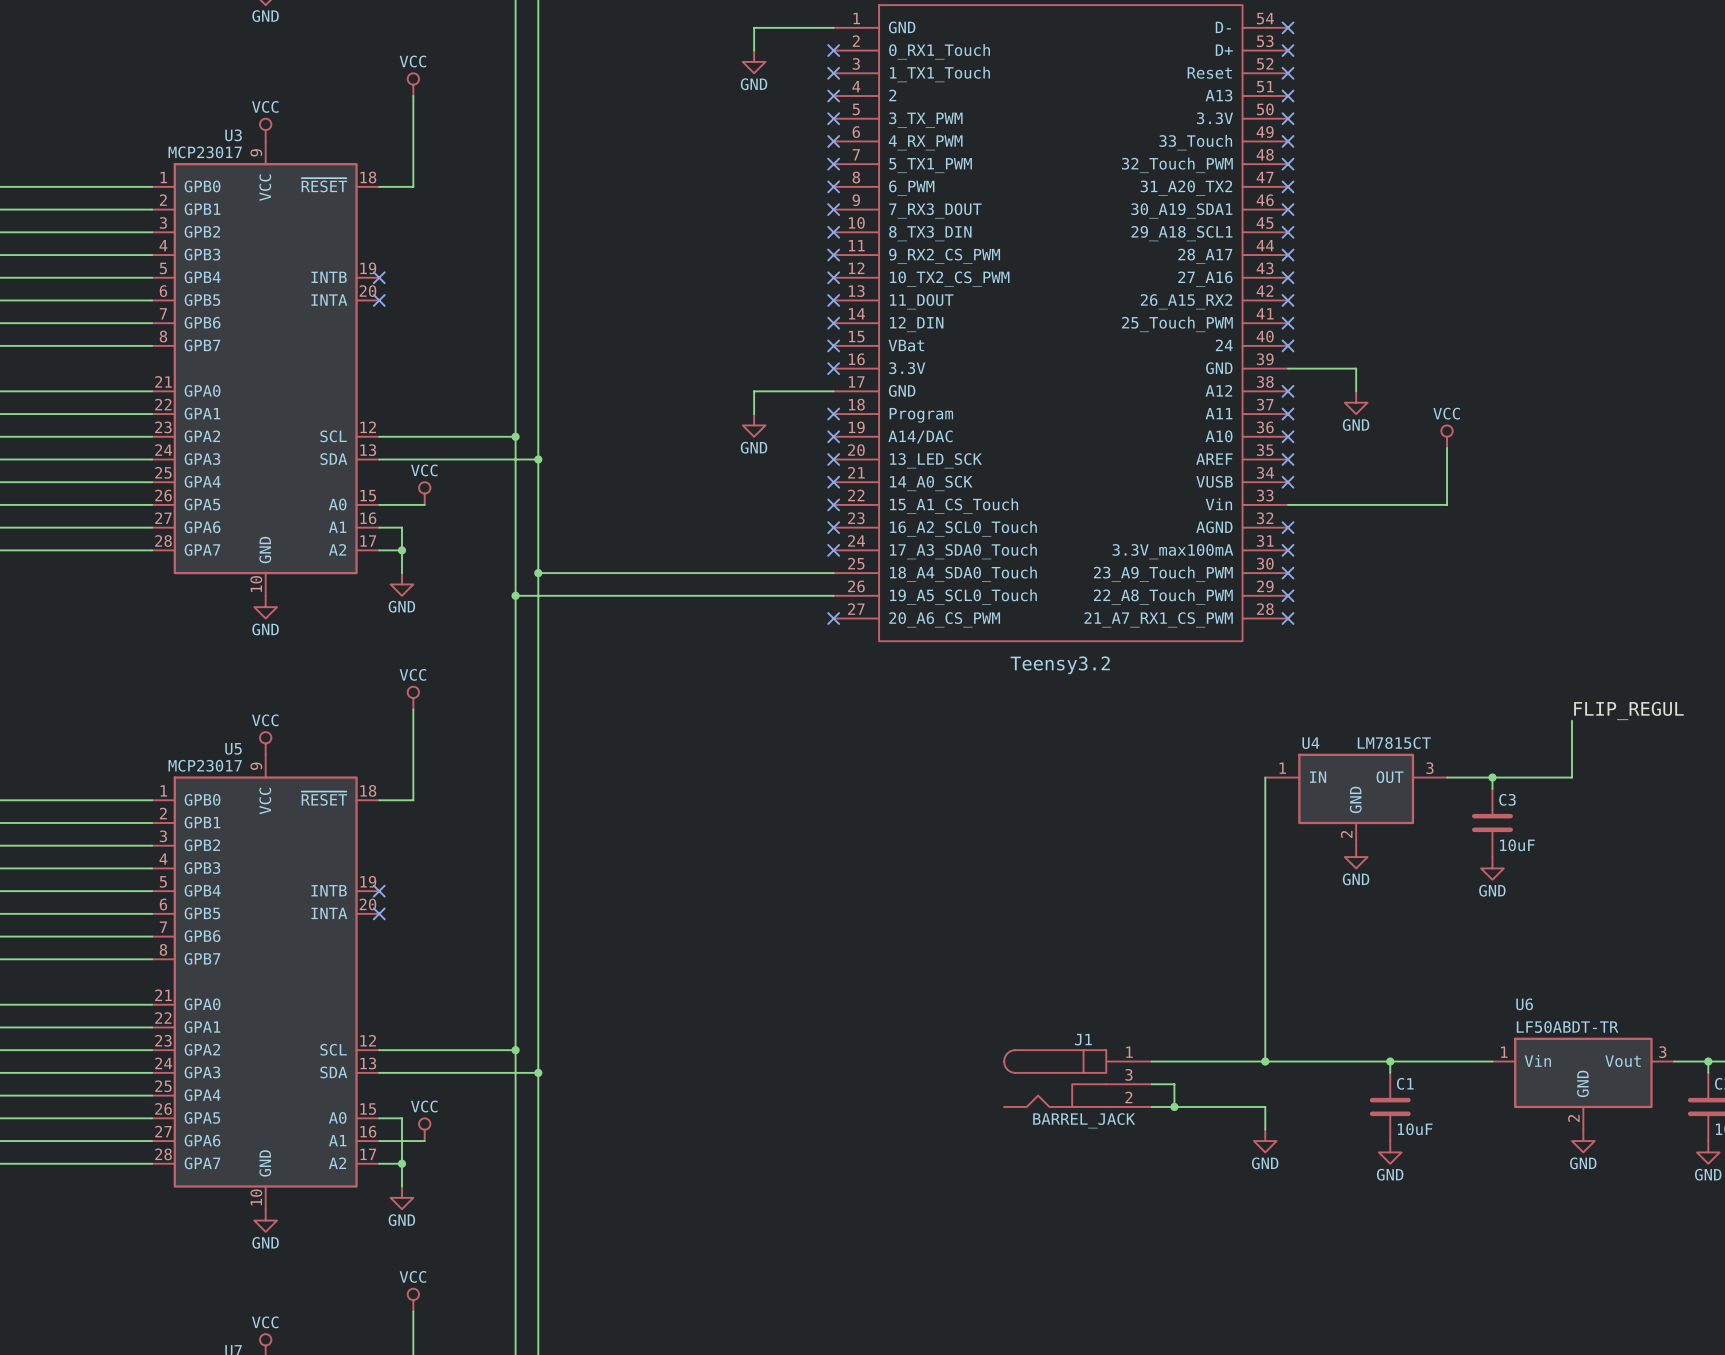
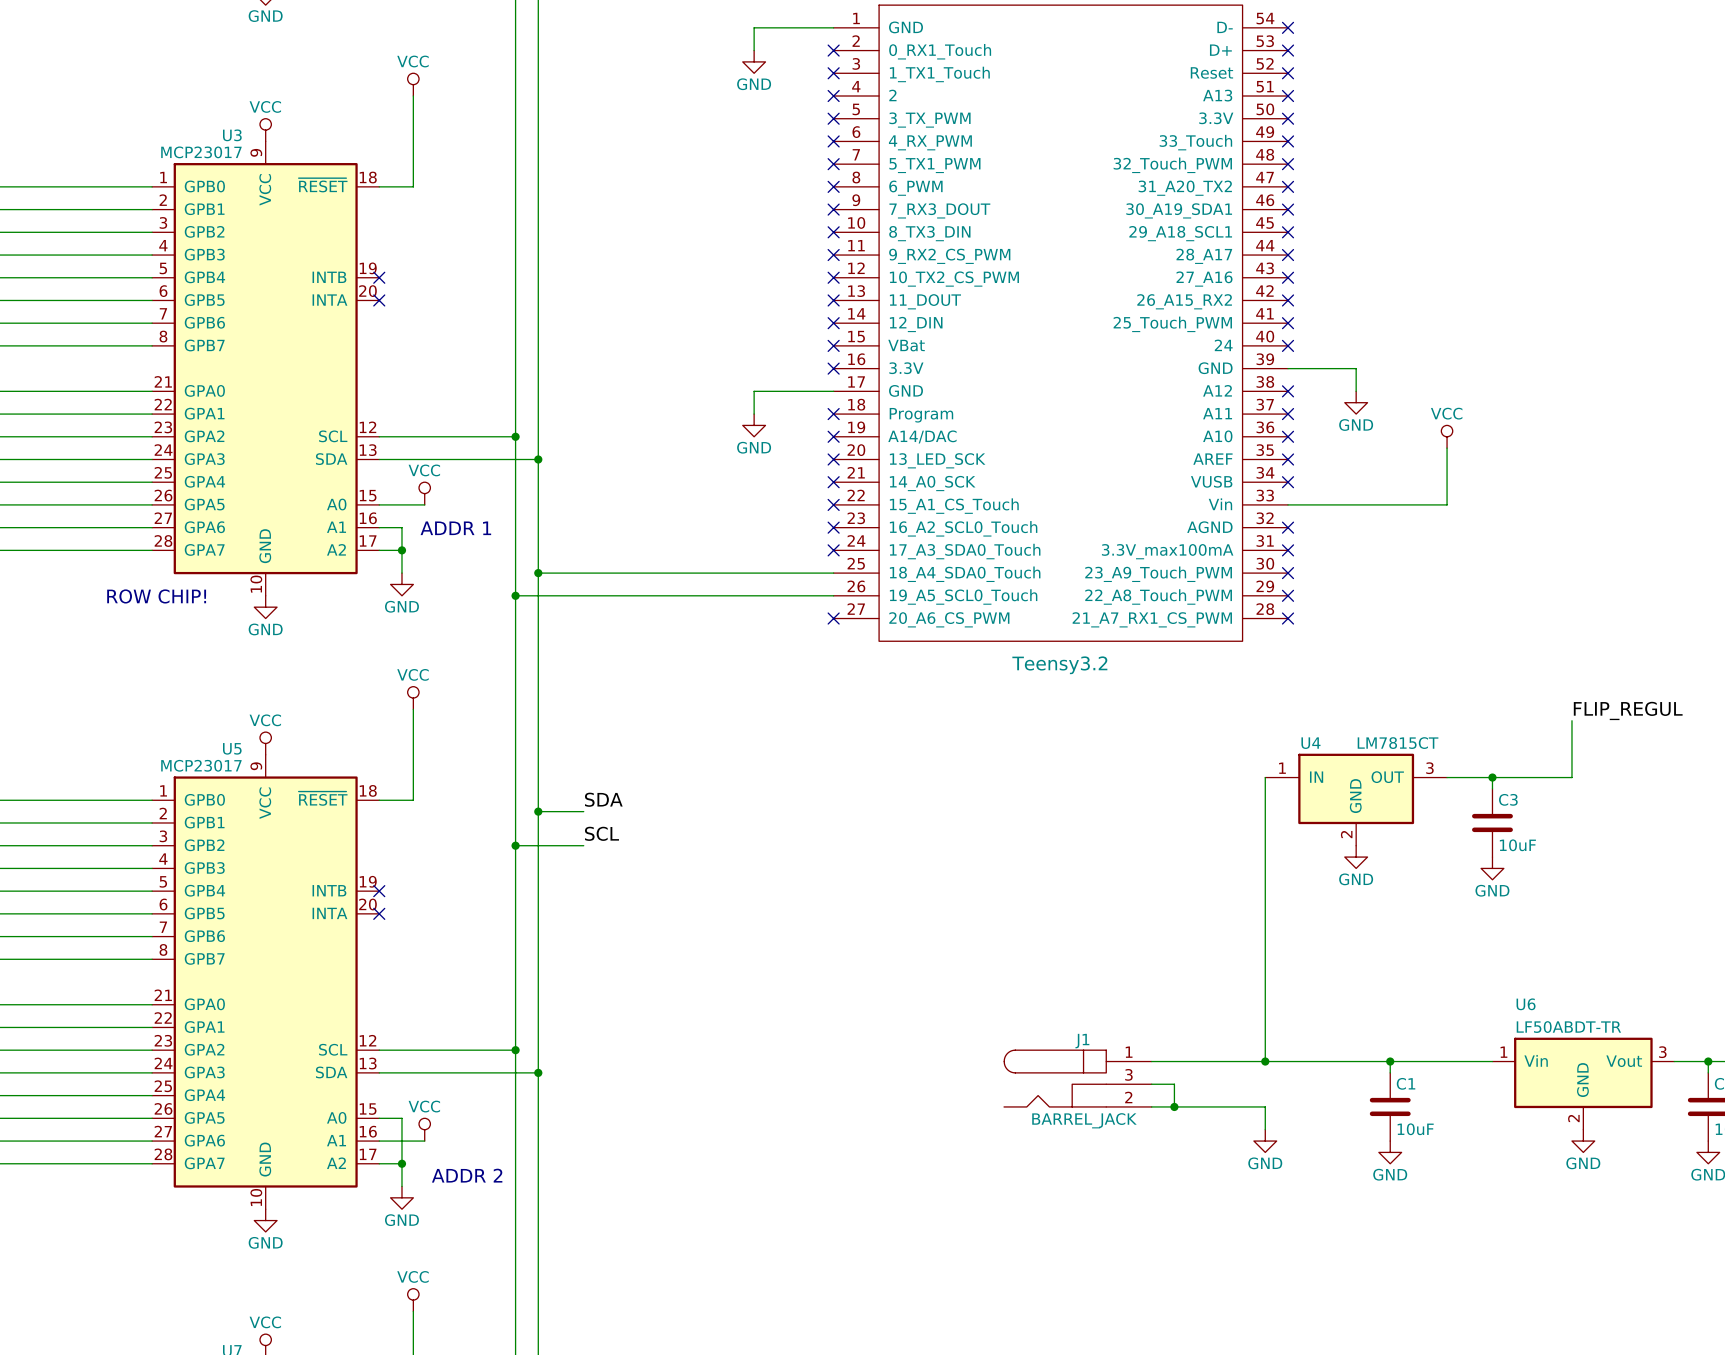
text: none -> ADDR 1 (455, 528)
text: none -> ROW CHIP! (156, 596)
label: none -> SDA (603, 799)
wire: none -> (538, 811) (583, 811)
junction: none -> (538, 811)
label: none -> SCL (601, 833)
wire: none -> (515, 845) (583, 845)
junction: none -> (515, 845)
text: none -> ADDR 2 (467, 1175)

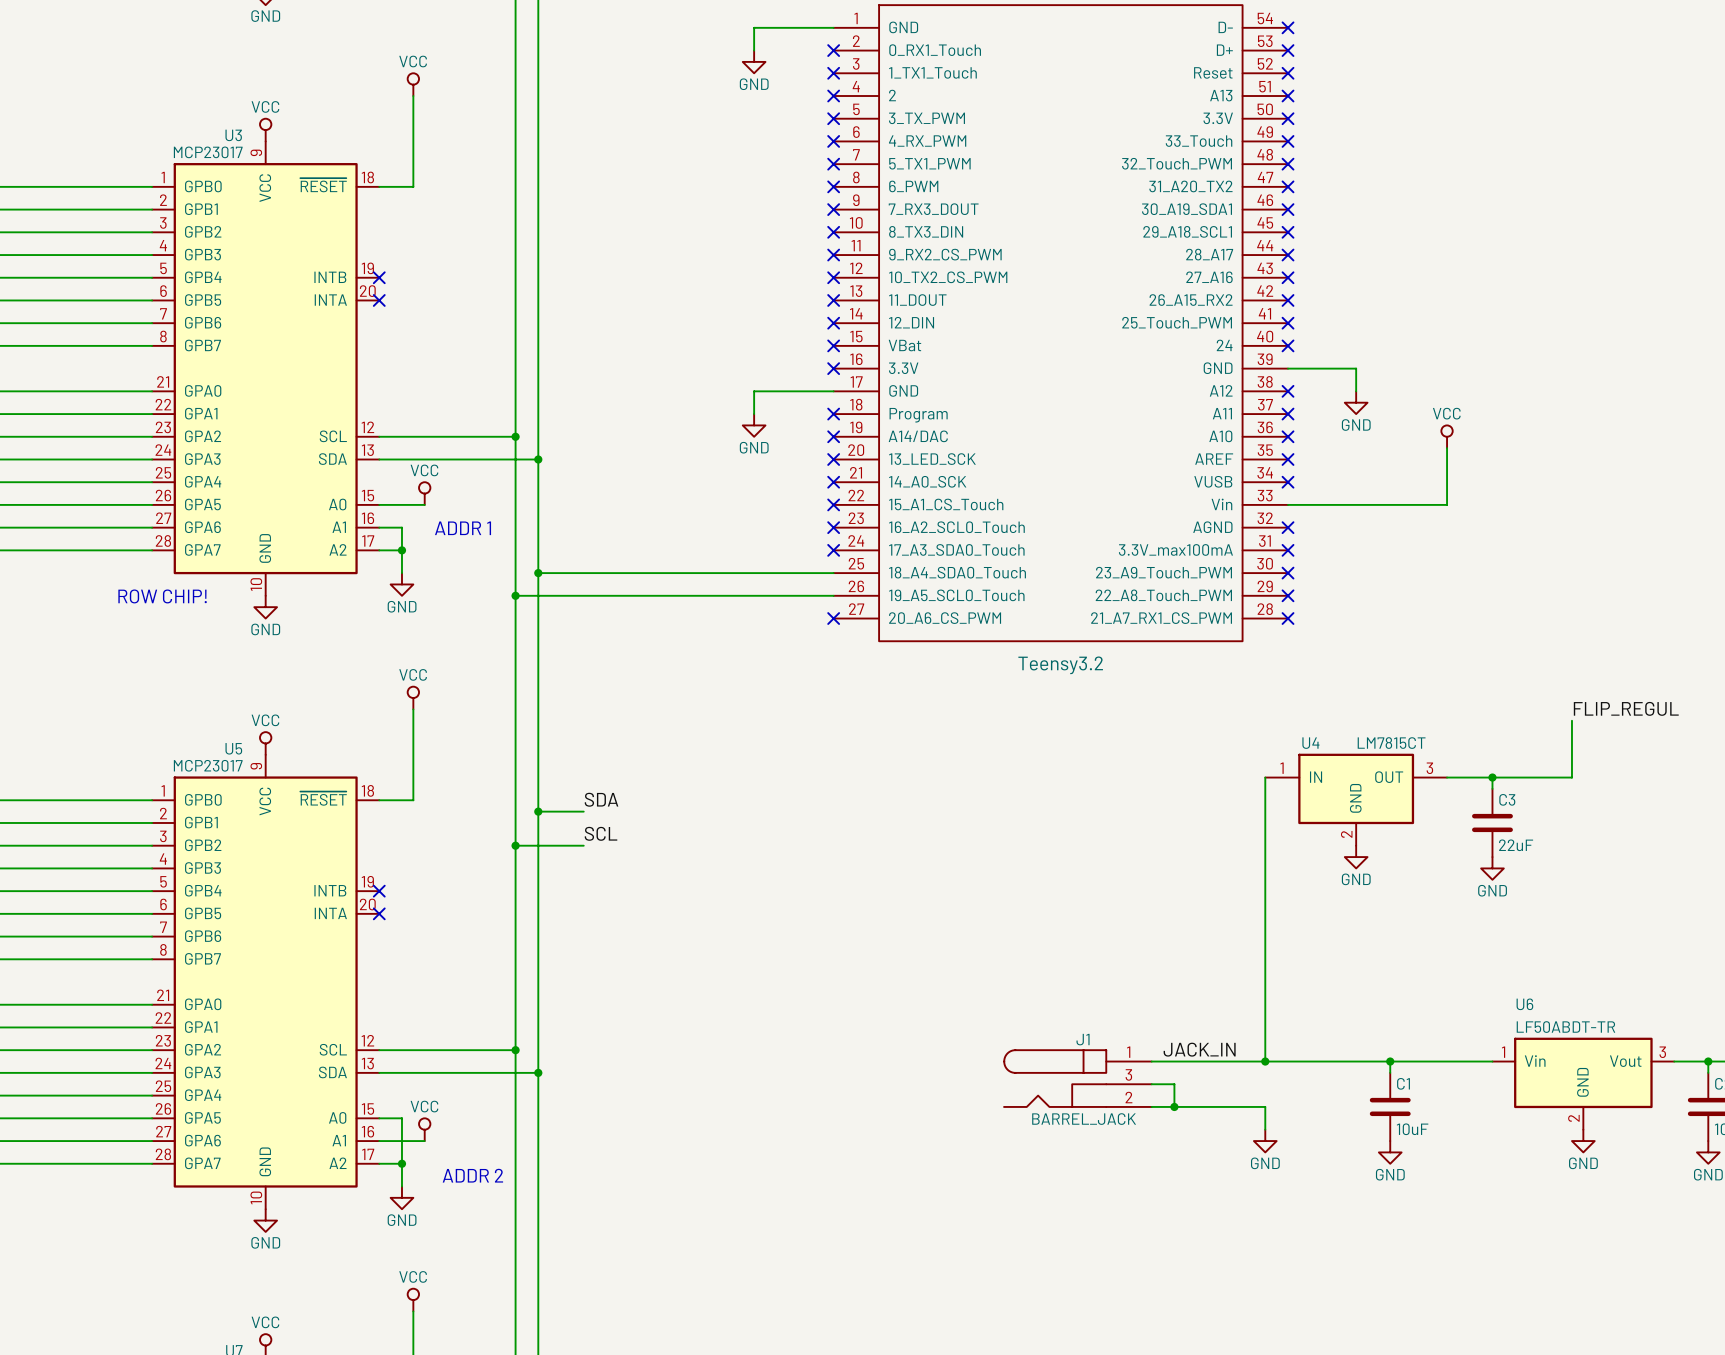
C3 value: 10uF (1517, 845) -> 22uF (1516, 845)
label: none -> JACK_IN (1199, 1049)

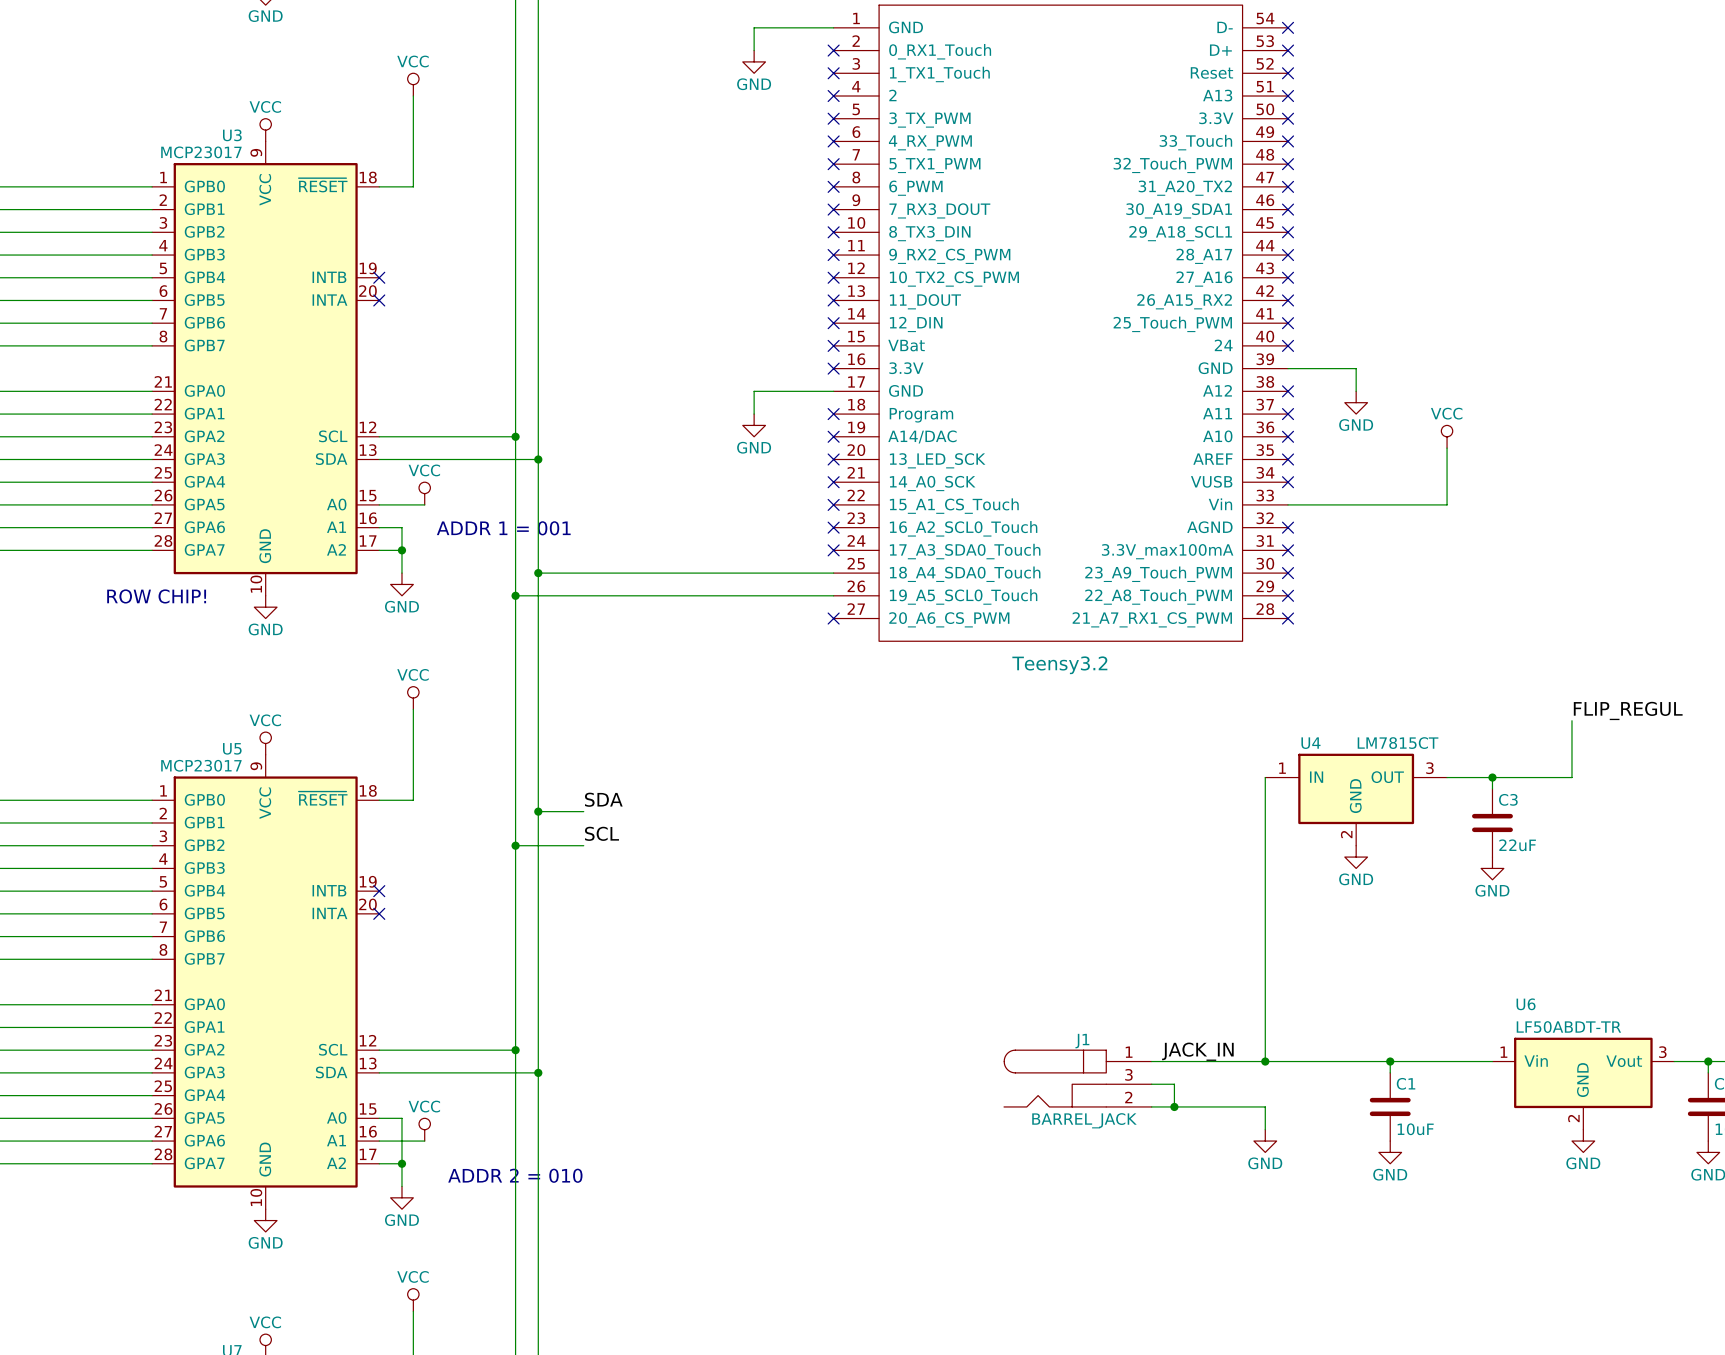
text: ADDR 1 (463, 528) -> ADDR 1 = 001 (503, 528)
text: ADDR 2 (472, 1175) -> ADDR 2 = 010 (515, 1175)

